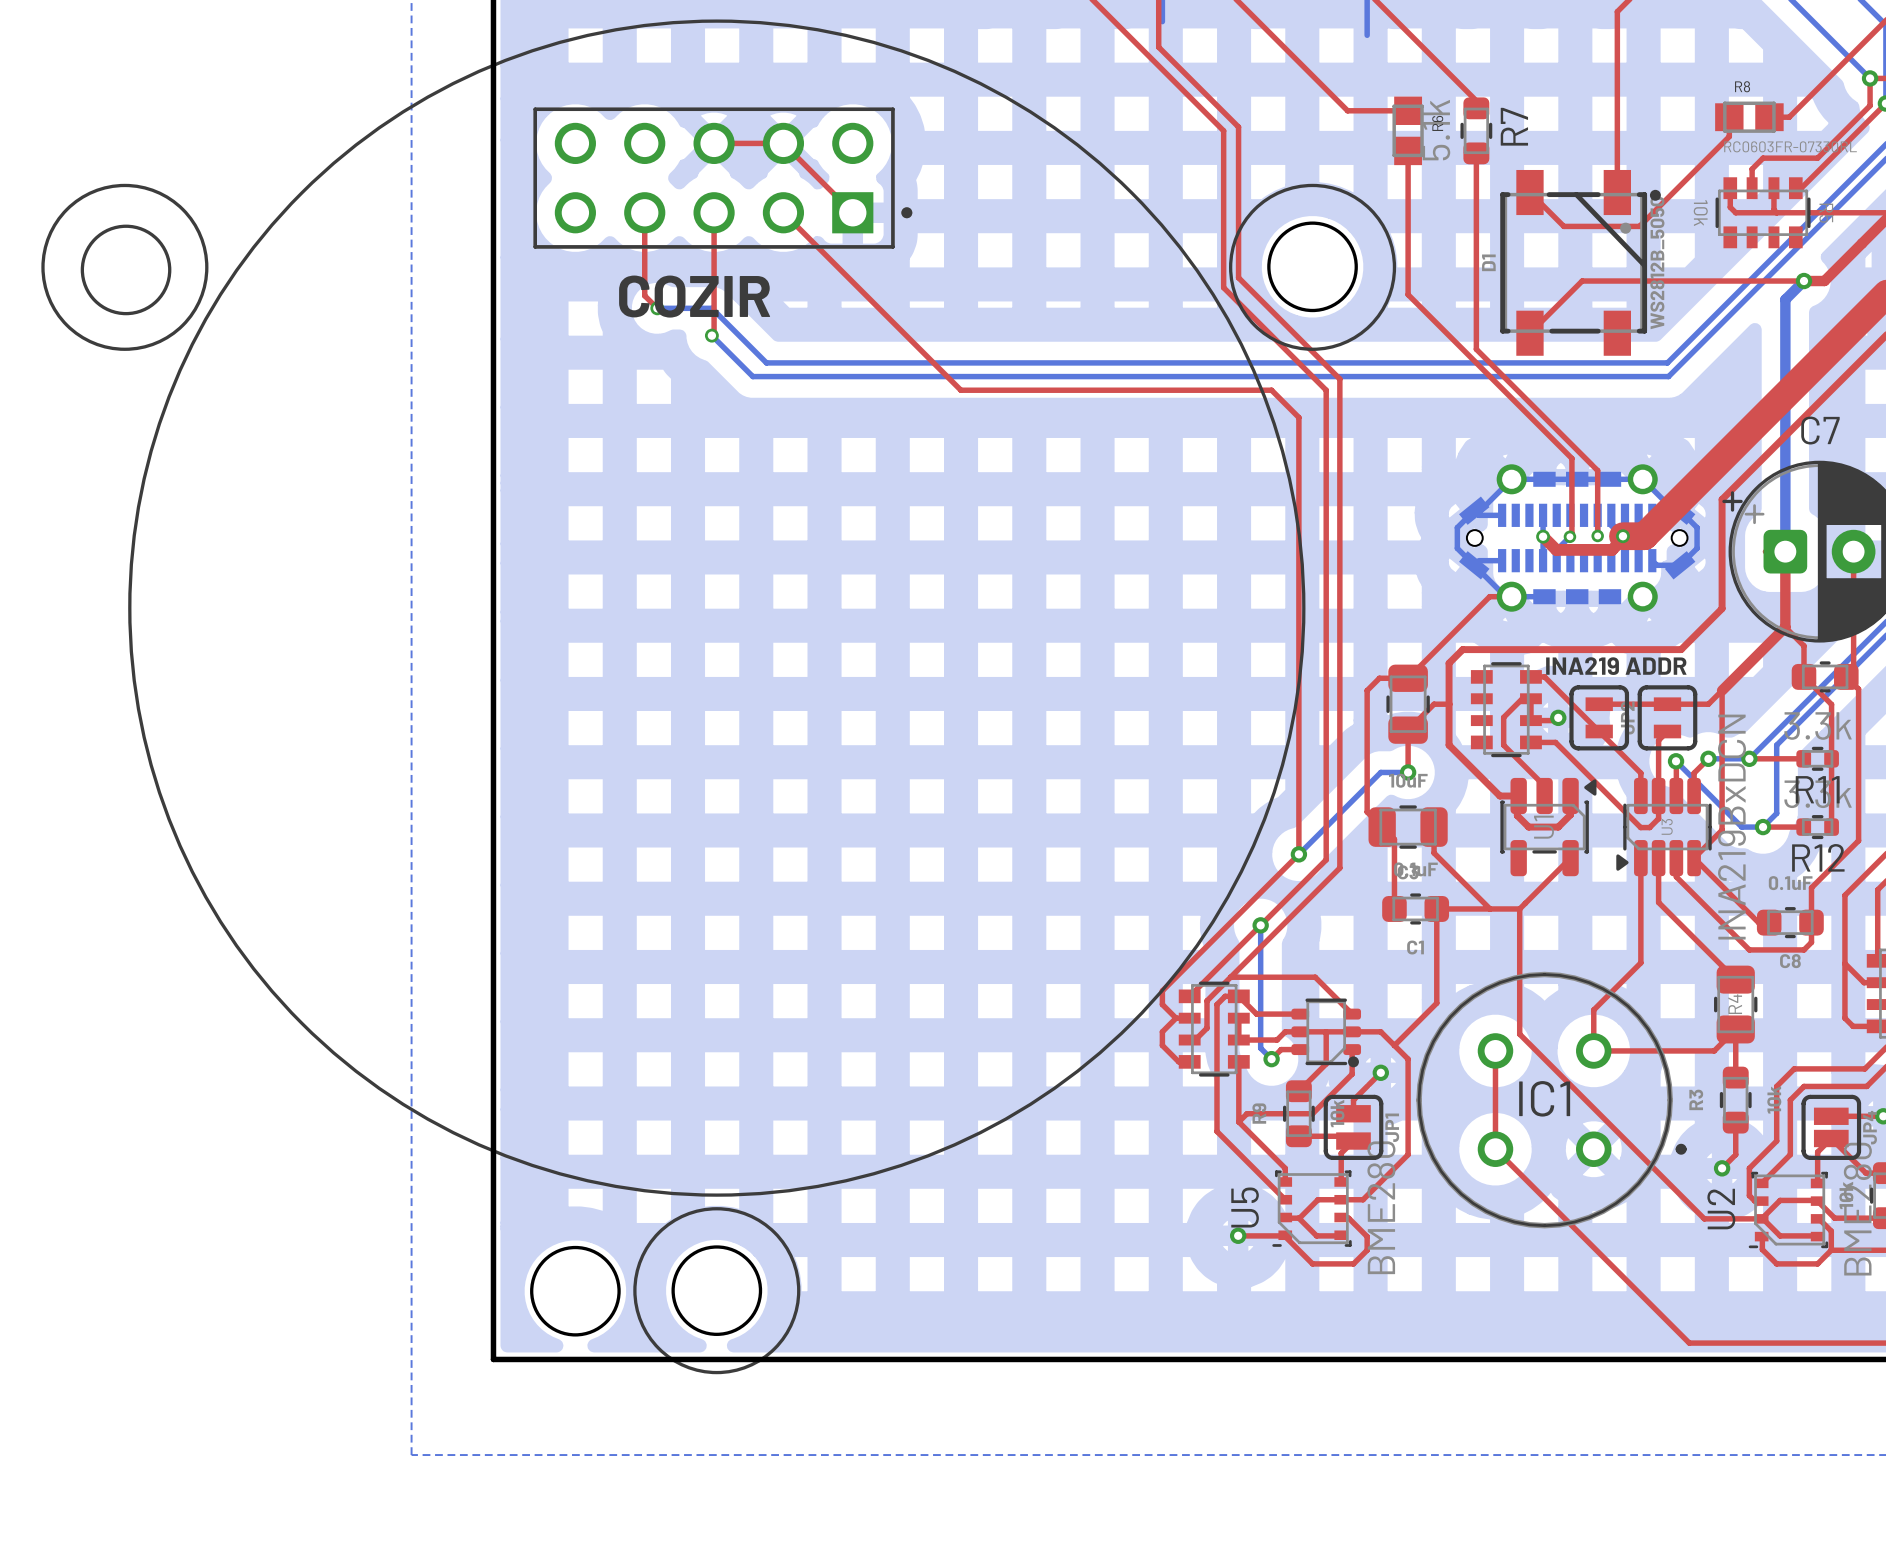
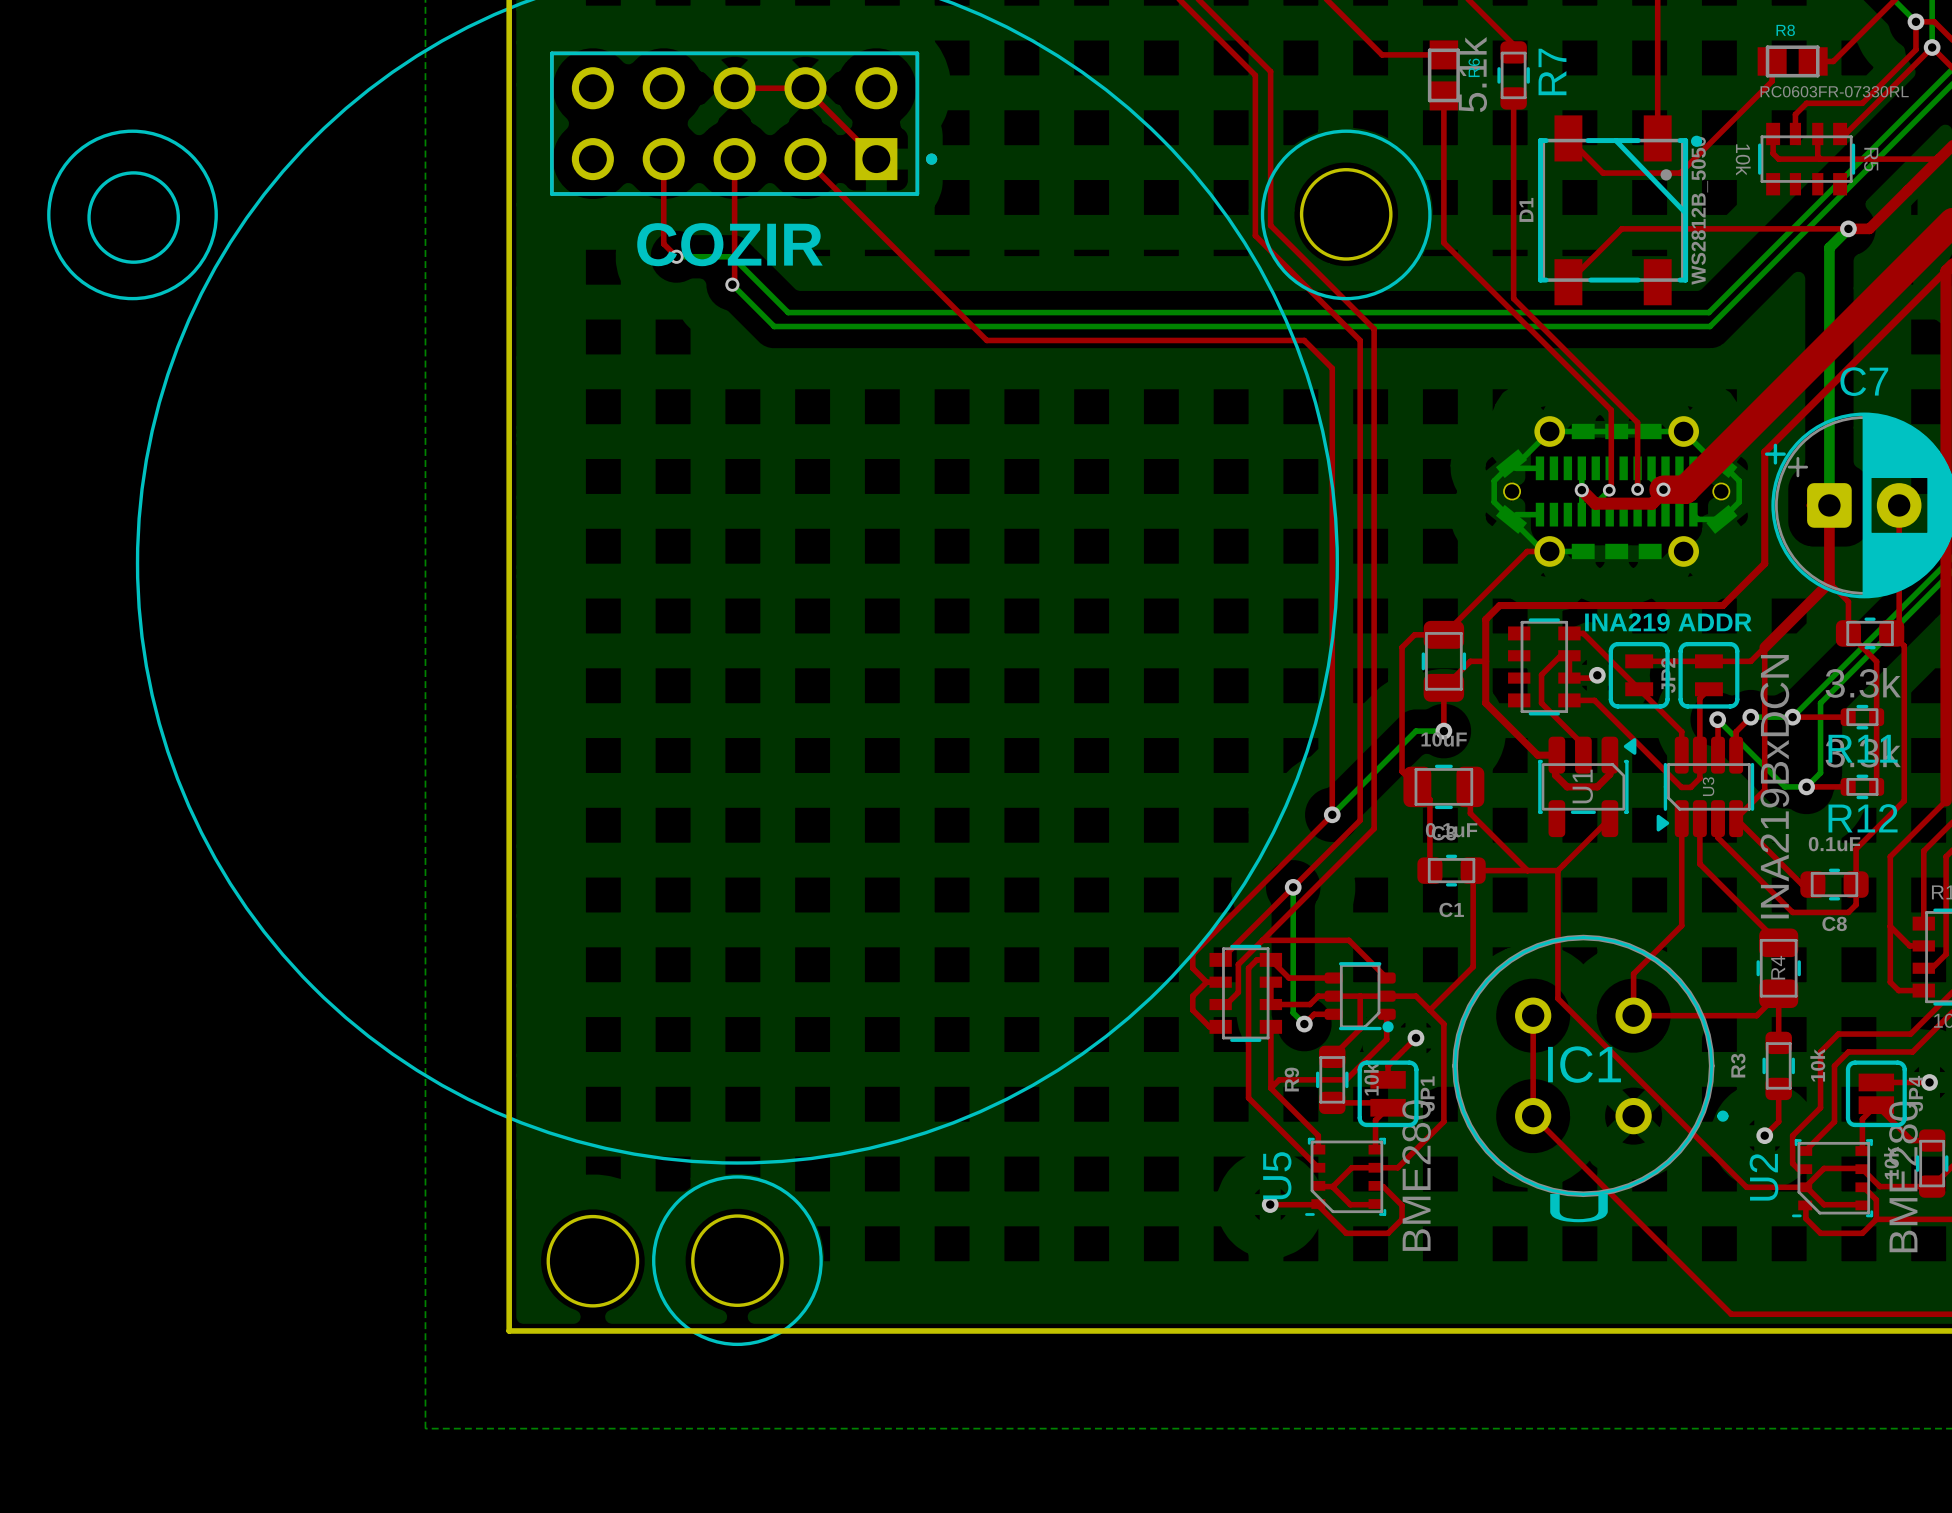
text: none -> U (1579, 1208)

